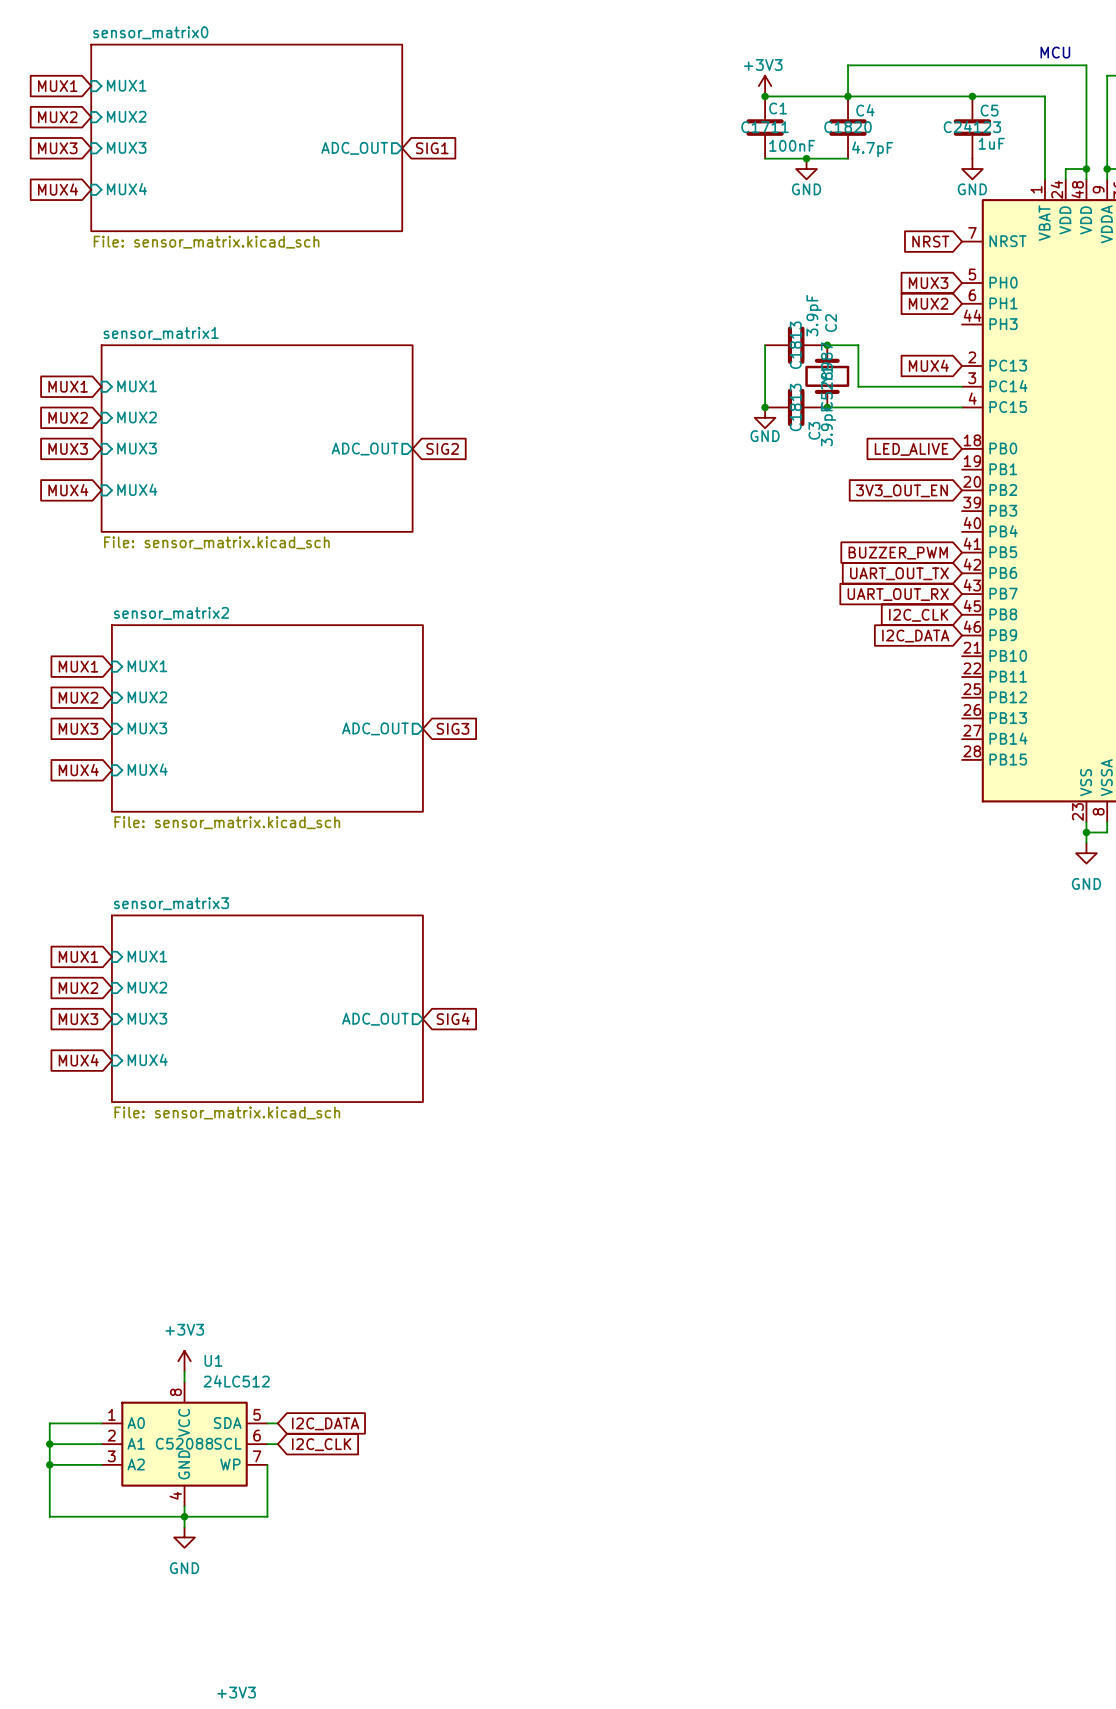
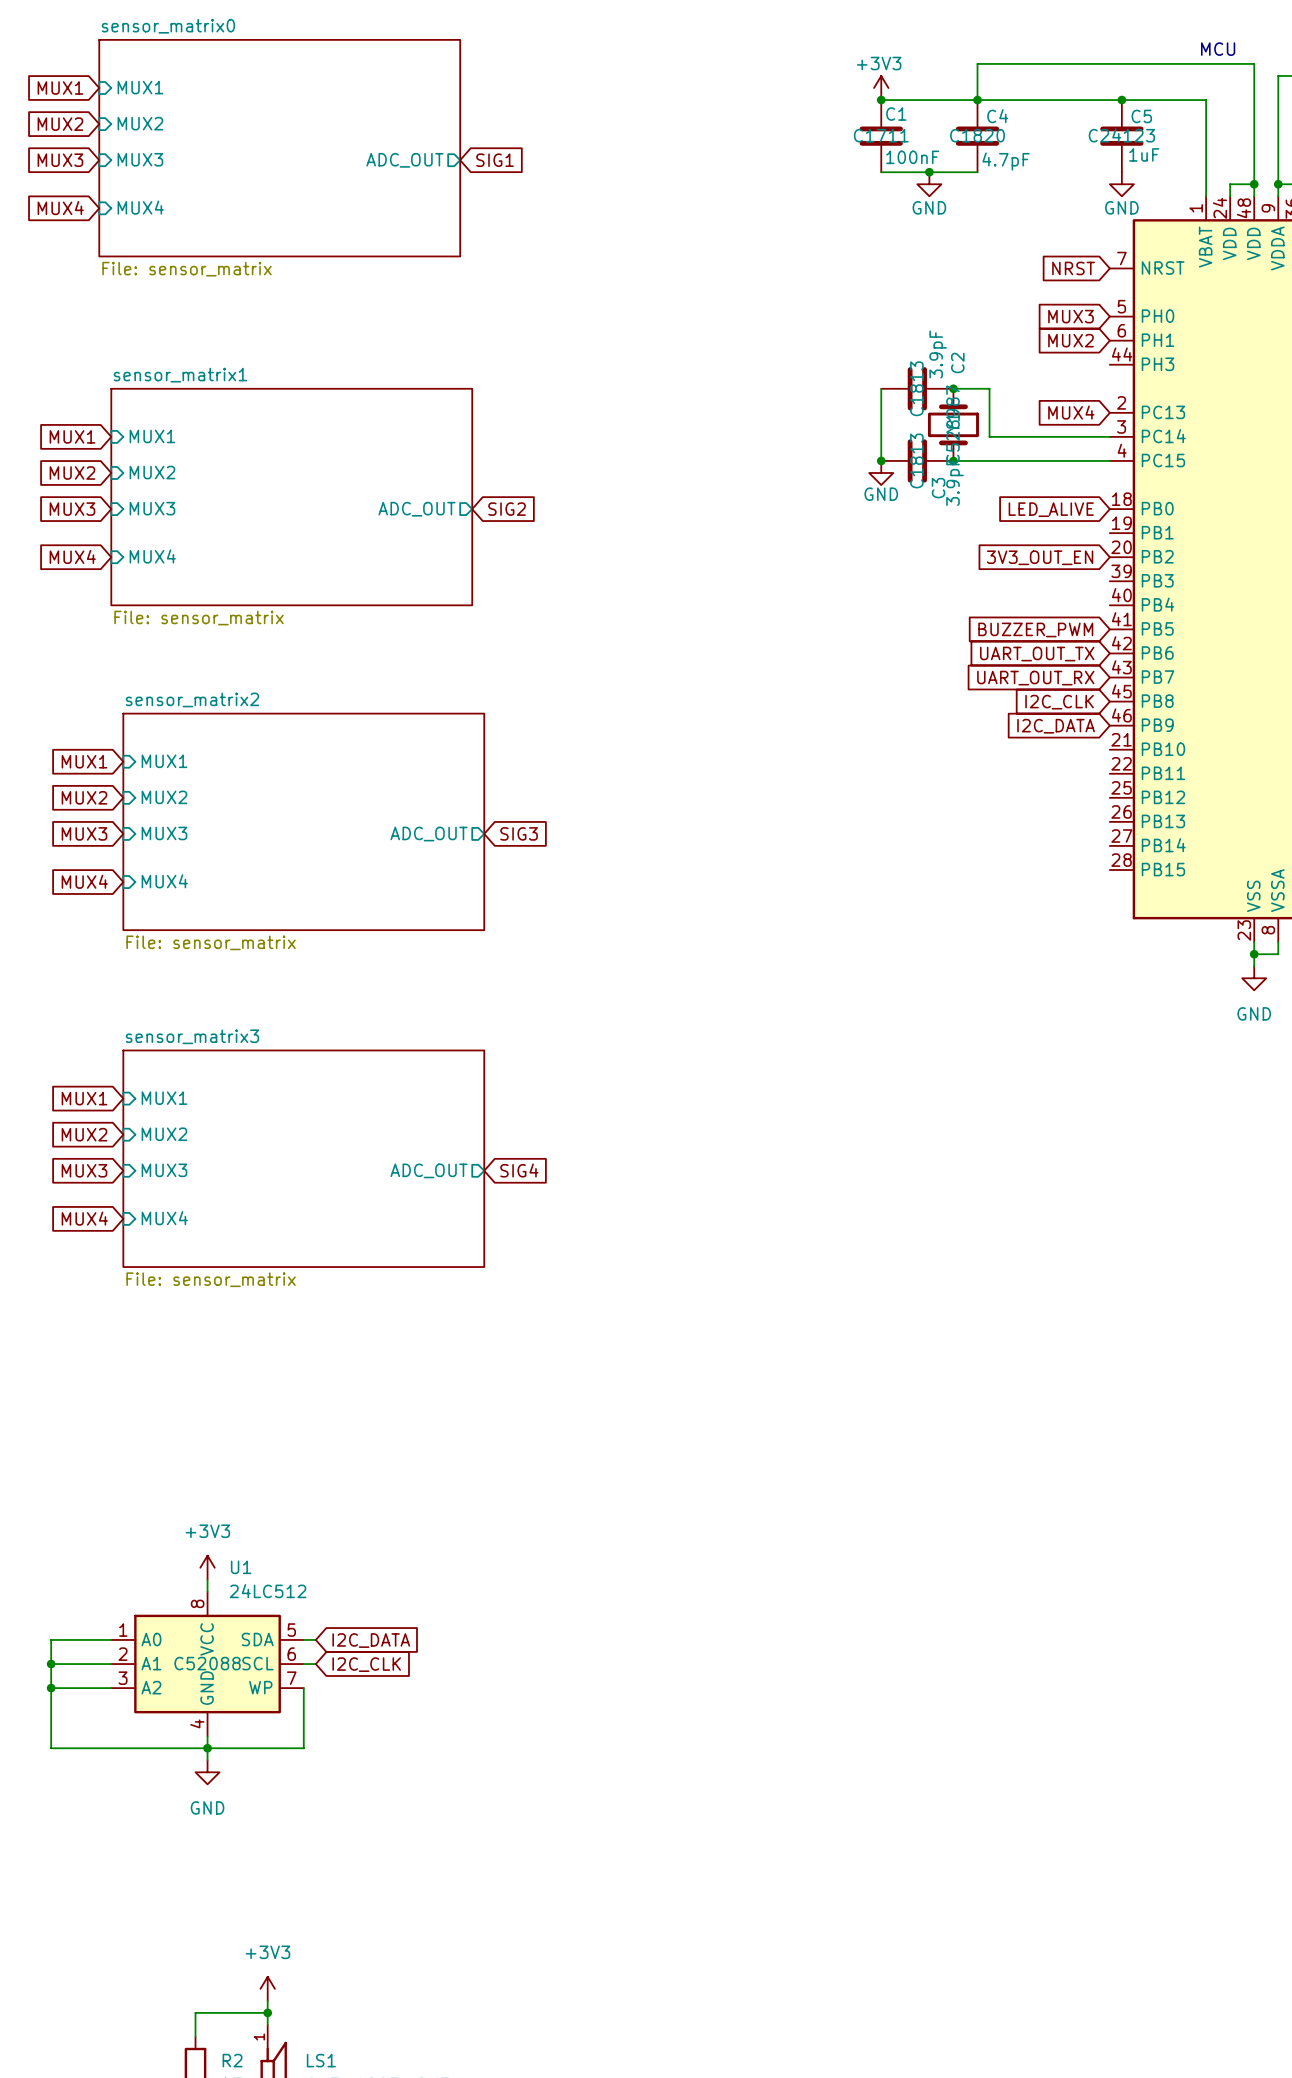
sheet sensor_matrix0 value: File: sensor_matrix.kicad_sch (206, 242) -> File: sensor_matrix (187, 269)
sheet sensor_matrix1 value: File: sensor_matrix.kicad_sch (216, 542) -> File: sensor_matrix (199, 618)
sheet sensor_matrix2 value: File: sensor_matrix.kicad_sch (227, 822) -> File: sensor_matrix (211, 942)
sheet sensor_matrix3 value: File: sensor_matrix.kicad_sch (227, 1112) -> File: sensor_matrix (211, 1279)

